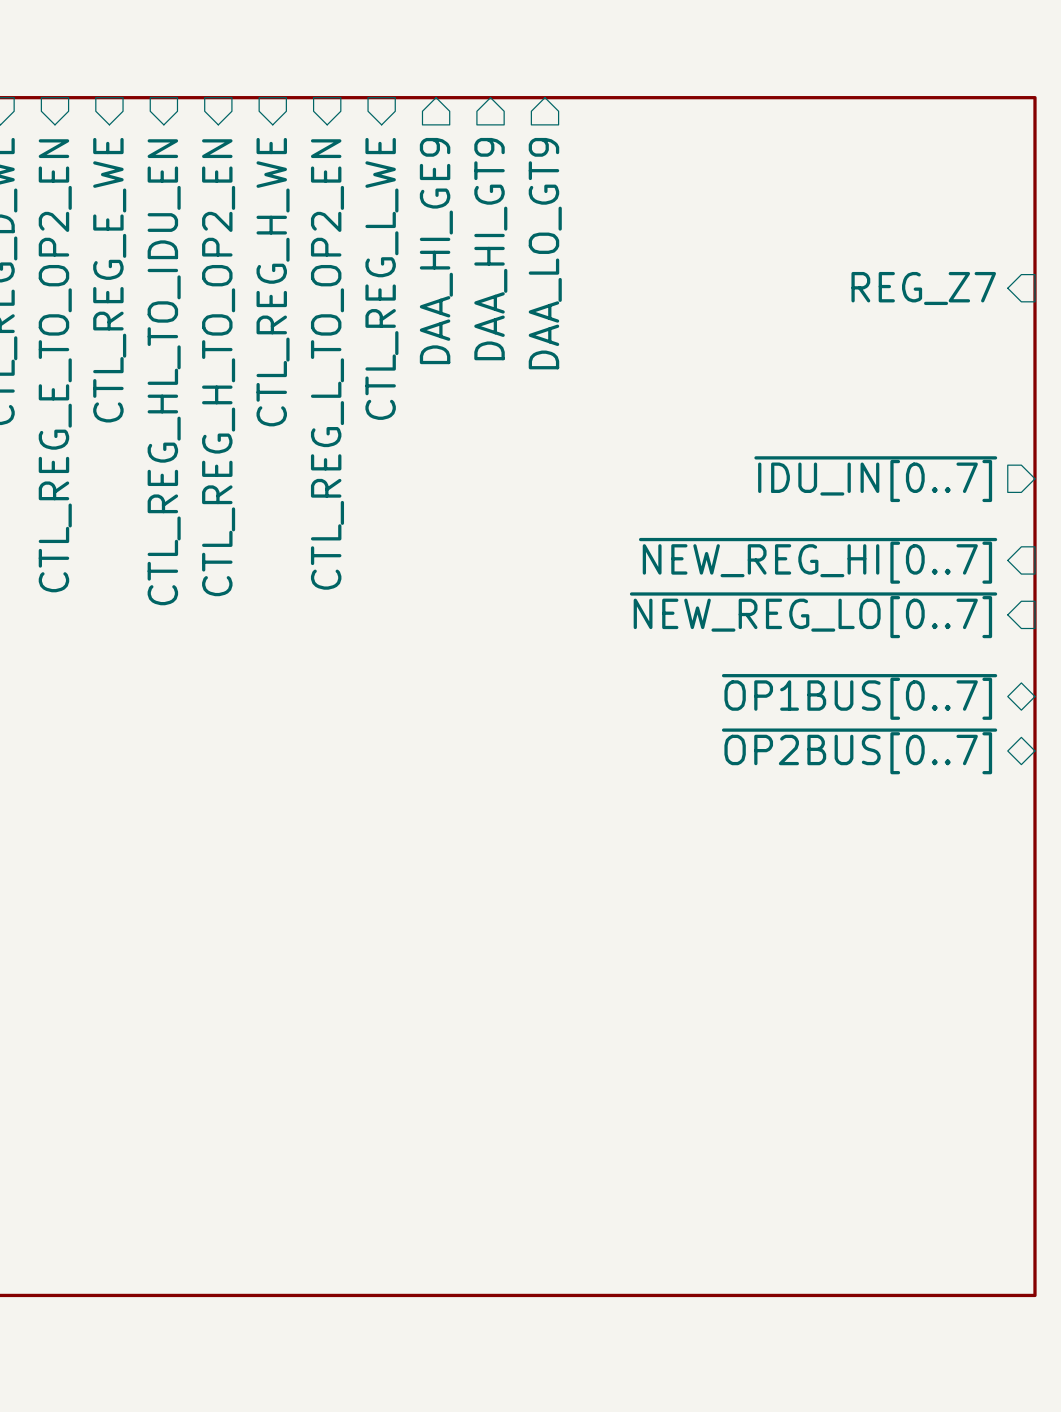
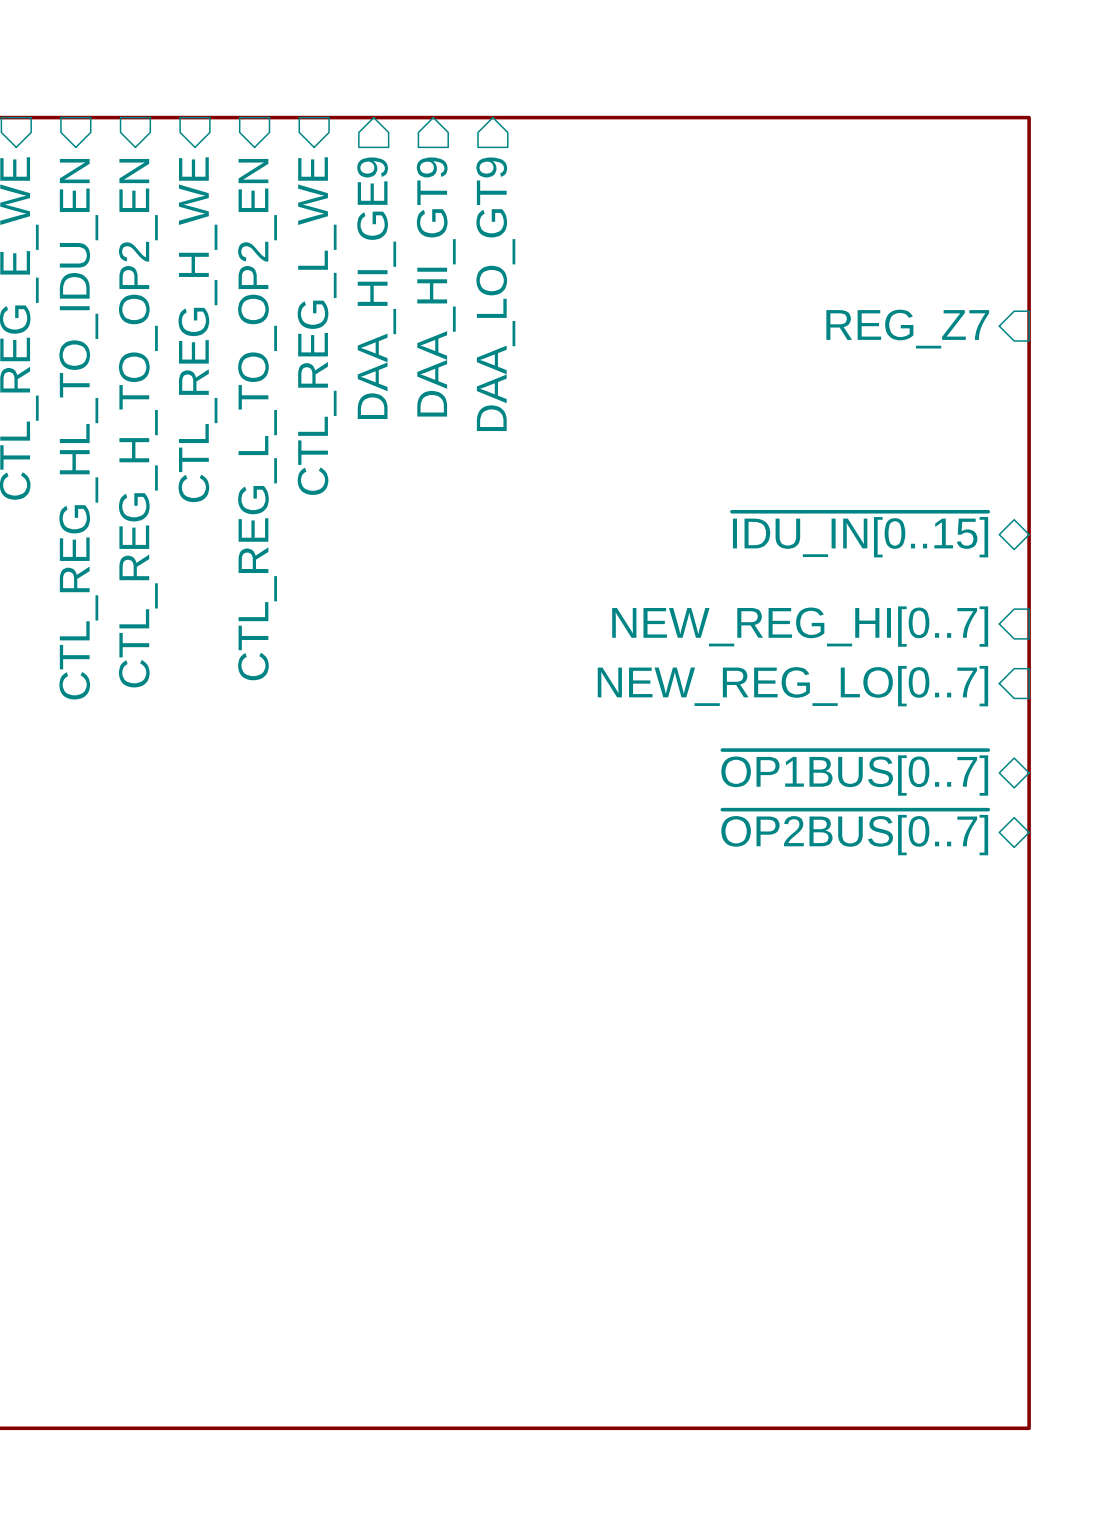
sheet pin shape: output (875, 479) -> bidirectional (860, 534)
sheet pin: ~{IDU_IN[0..7]} (875, 479) -> ~{IDU_IN[0..15]} (860, 534)
sheet pin: ~{NEW_REG_HI[0..7]} (818, 560) -> NEW_REG_HI[0..7] (800, 626)
sheet pin: ~{NEW_REG_LO[0..7]} (813, 615) -> NEW_REG_LO[0..7] (792, 686)

